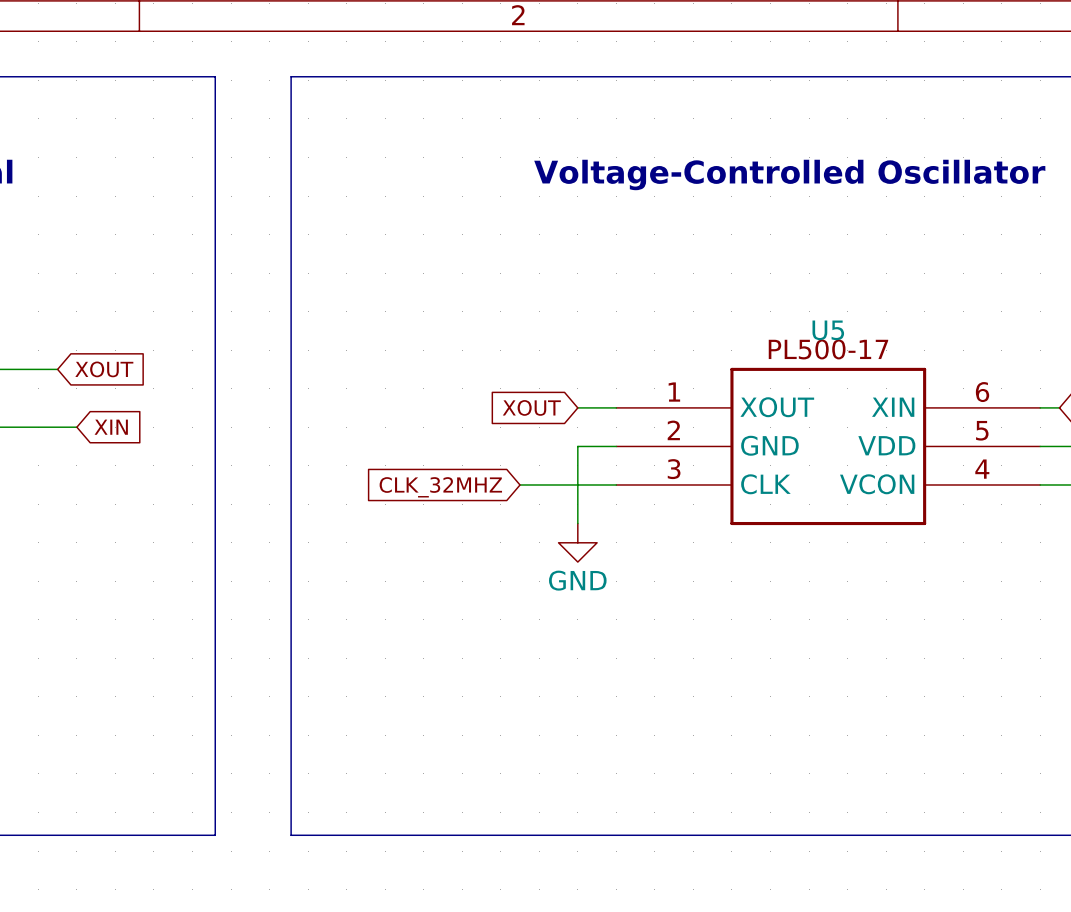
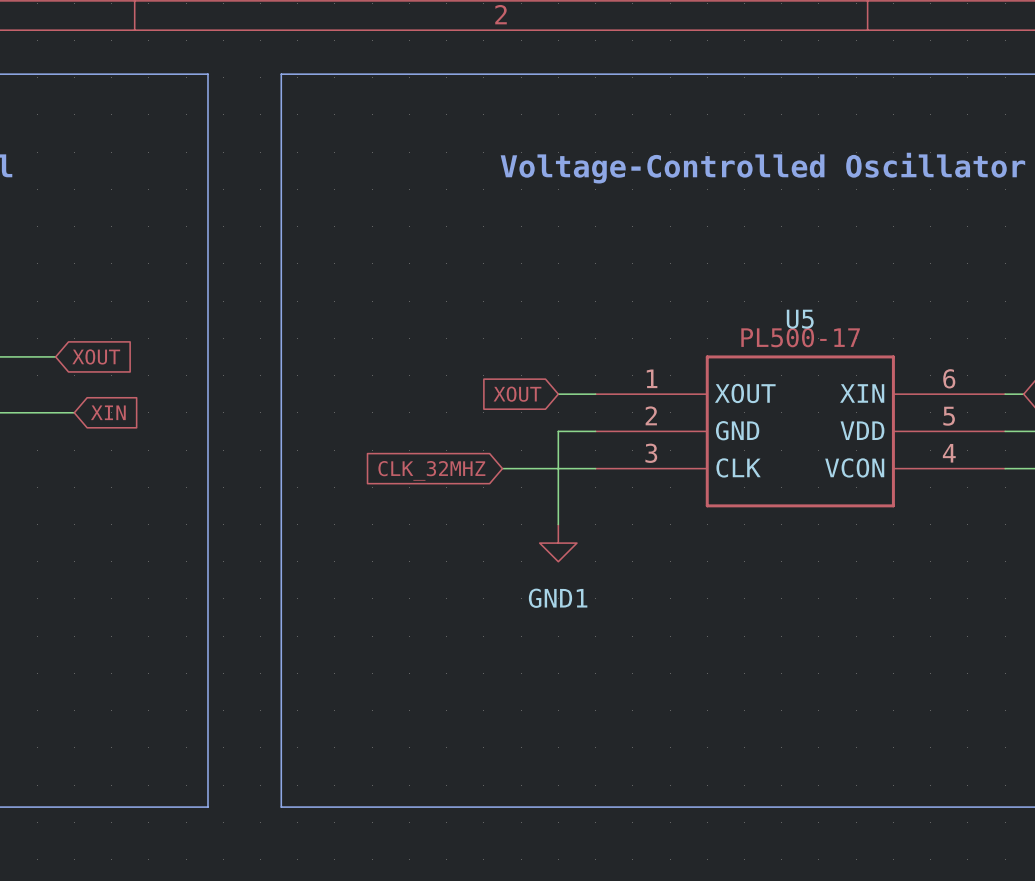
power symbol: GND (577, 542) -> none
power symbol: none -> GND1 (558, 543)

